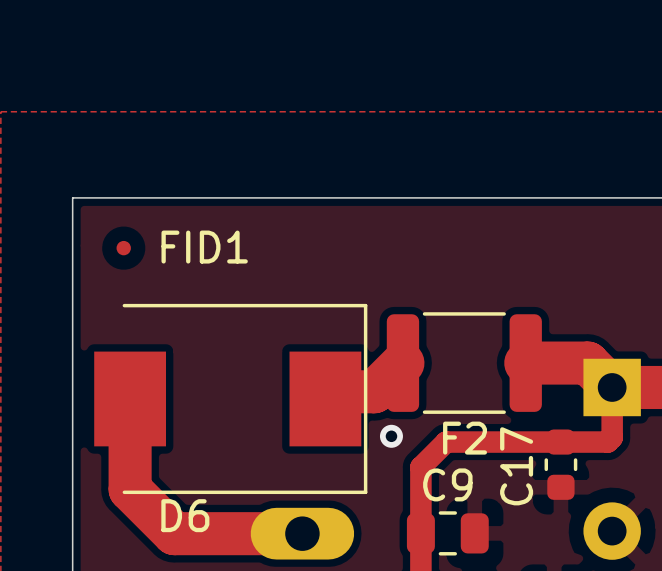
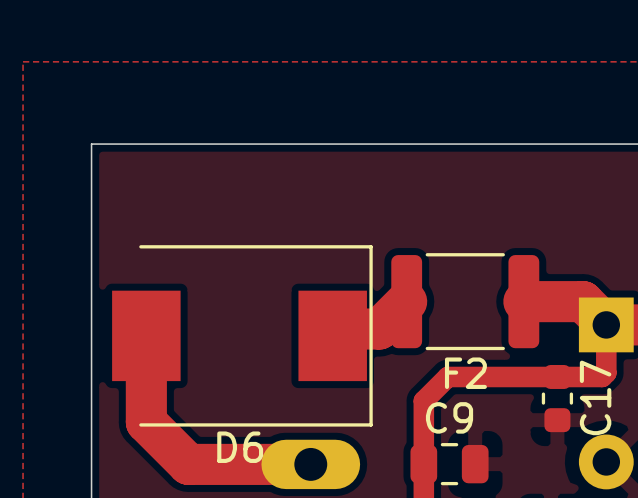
FID1: (123, 248) -> none
via: (391, 436) -> none
C17 name position: C17 (516, 466) -> C17 (595, 397)
D6 name position: D6 (185, 515) -> D6 (240, 447)

